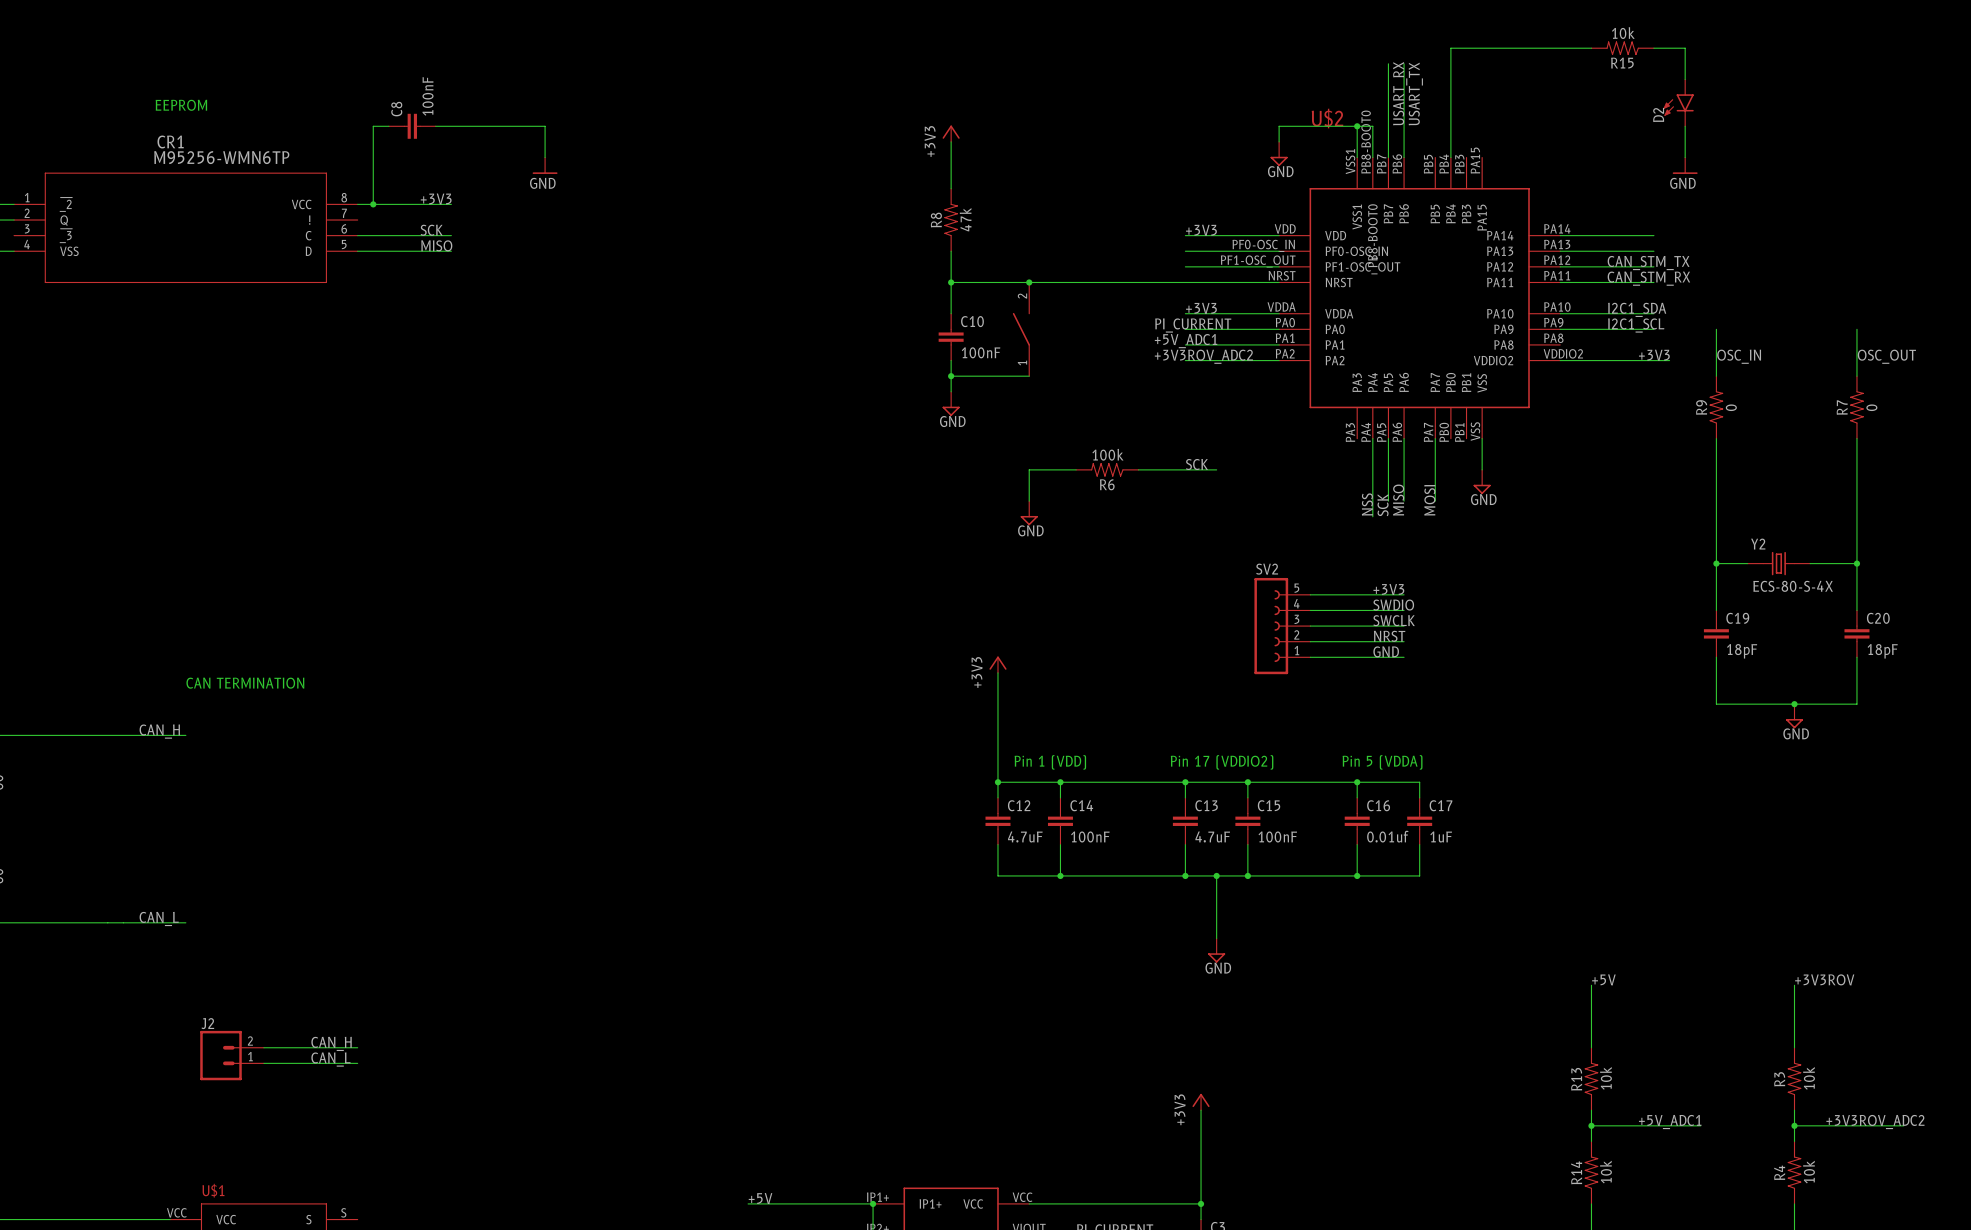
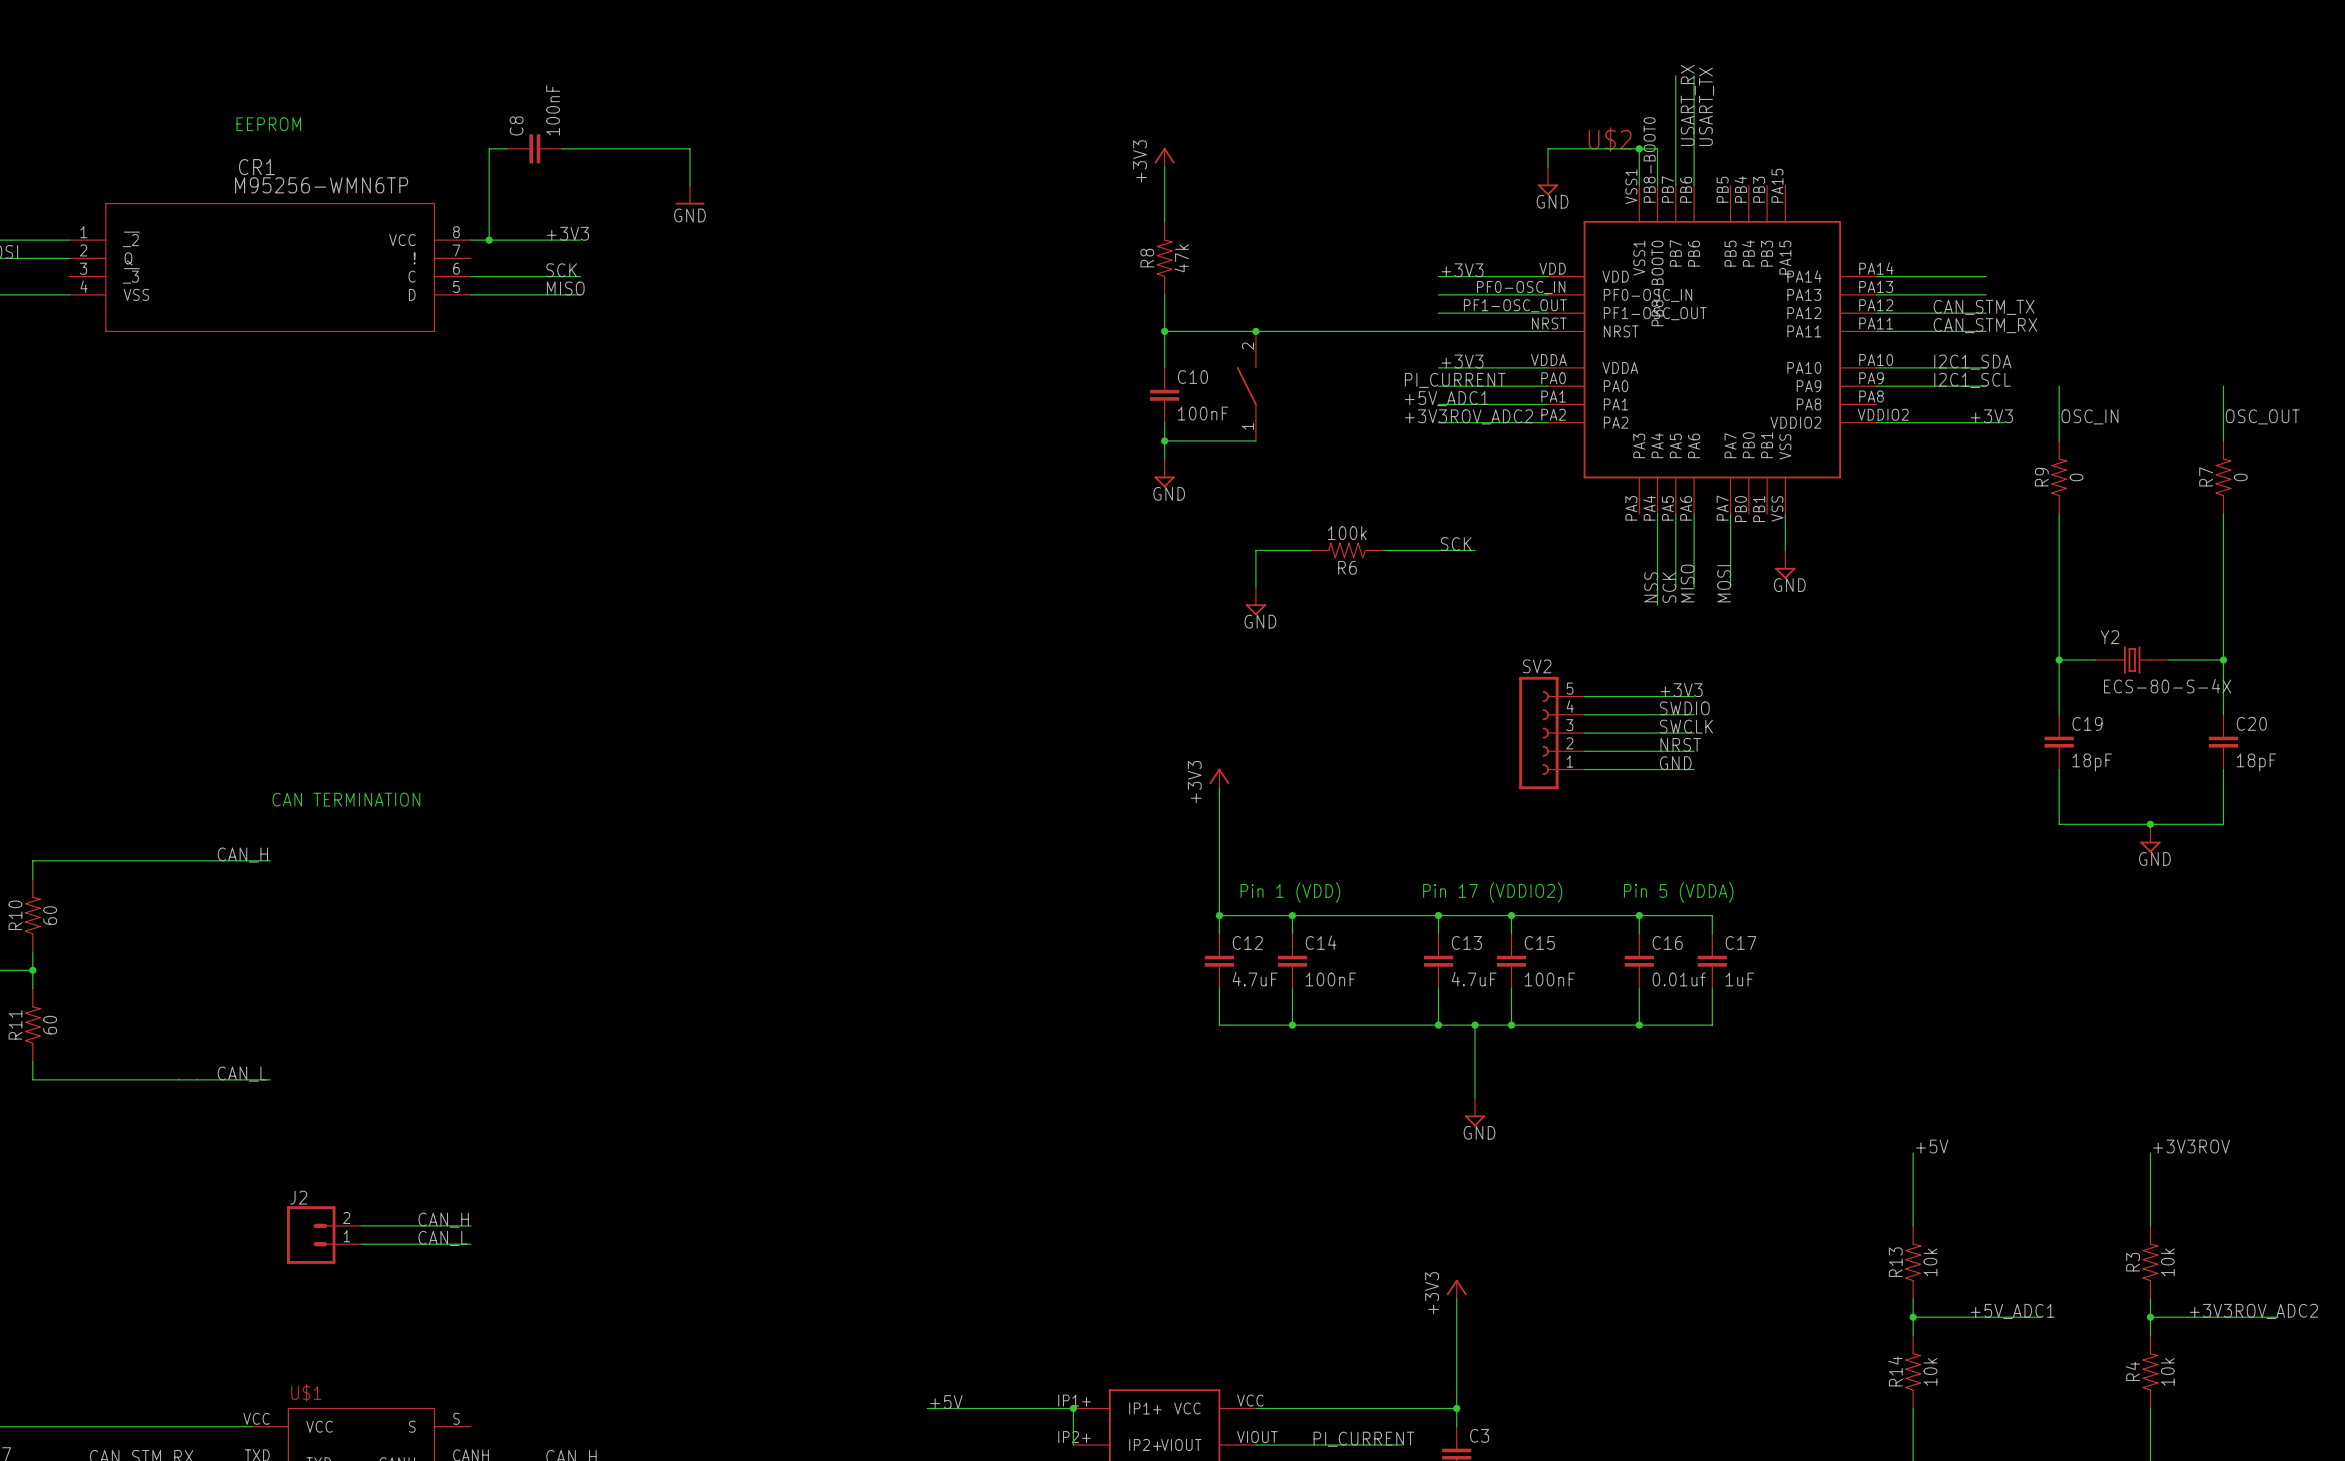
wire: (1591, 48) (1450, 48) (1450, 157) -> none
R15: 10k (1622, 48) -> none
wire: (1653, 48) (1685, 48) (1685, 79) -> none
D2: (1678, 102) -> none
wire: (1685, 126) (1685, 157) -> none
power symbol: GND (1685, 165) -> none

